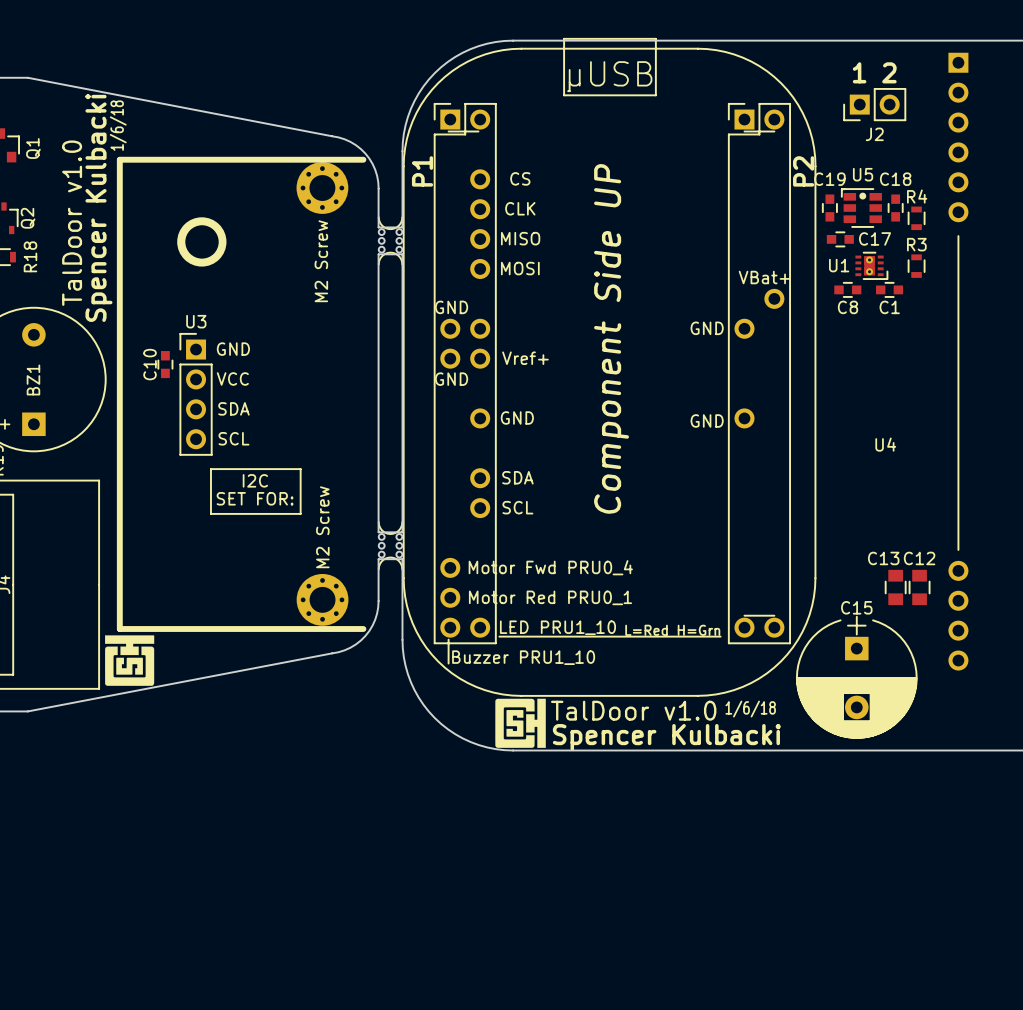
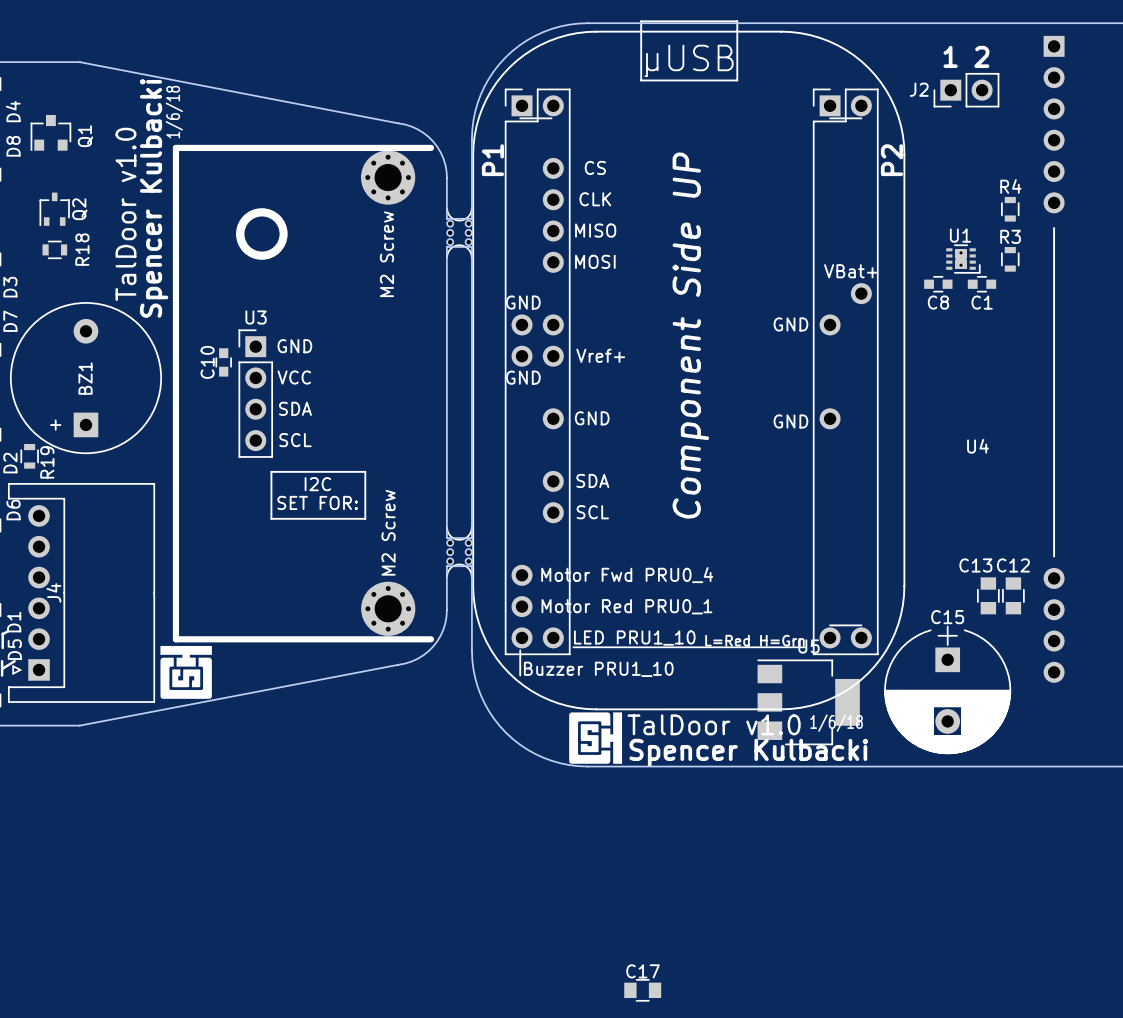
J2 name position: J2 (874, 134) -> J2 (919, 89)
U5 footprint: [843, 188, 882, 228] -> [757, 659, 860, 746]
line: (841, 189) (844, 189) -> none
line: (841, 189) (841, 196) -> none
drawing: [859, 192, 867, 200] -> none
line: (862, 196) (864, 196) -> none
C19: (829, 208) -> none
C18: (895, 208) -> none
C17 footprint: [826, 231, 854, 248] -> [624, 979, 662, 1002]
C17 name position: C17 (875, 238) -> C17 (643, 971)
U1 name position: U1 (839, 265) -> U1 (960, 235)

